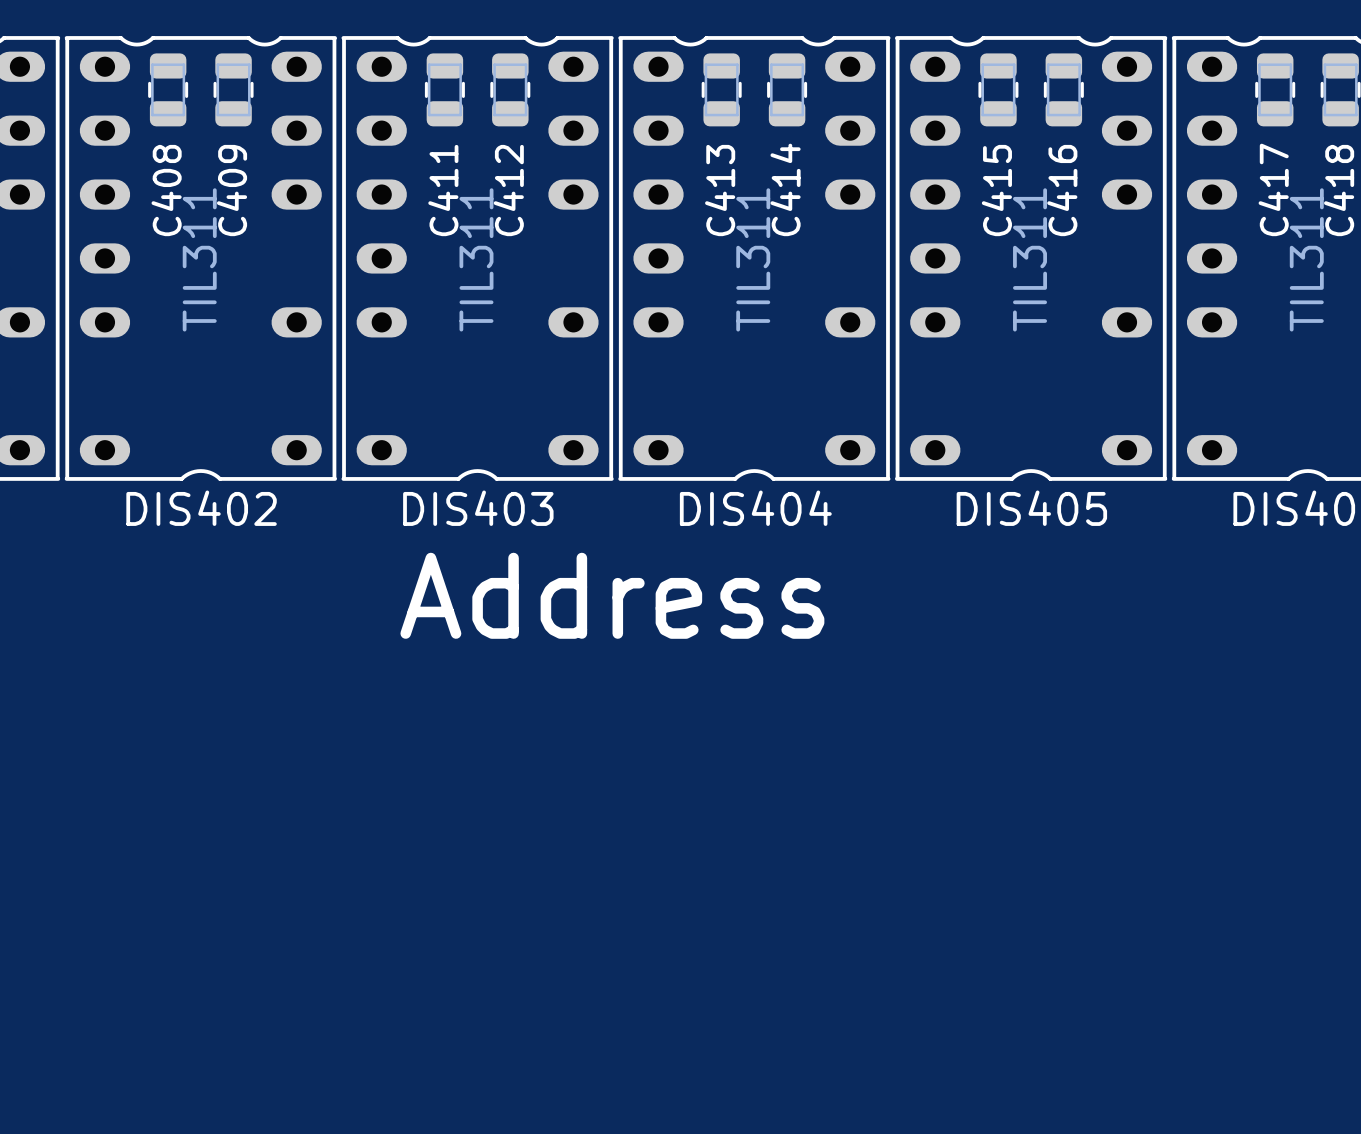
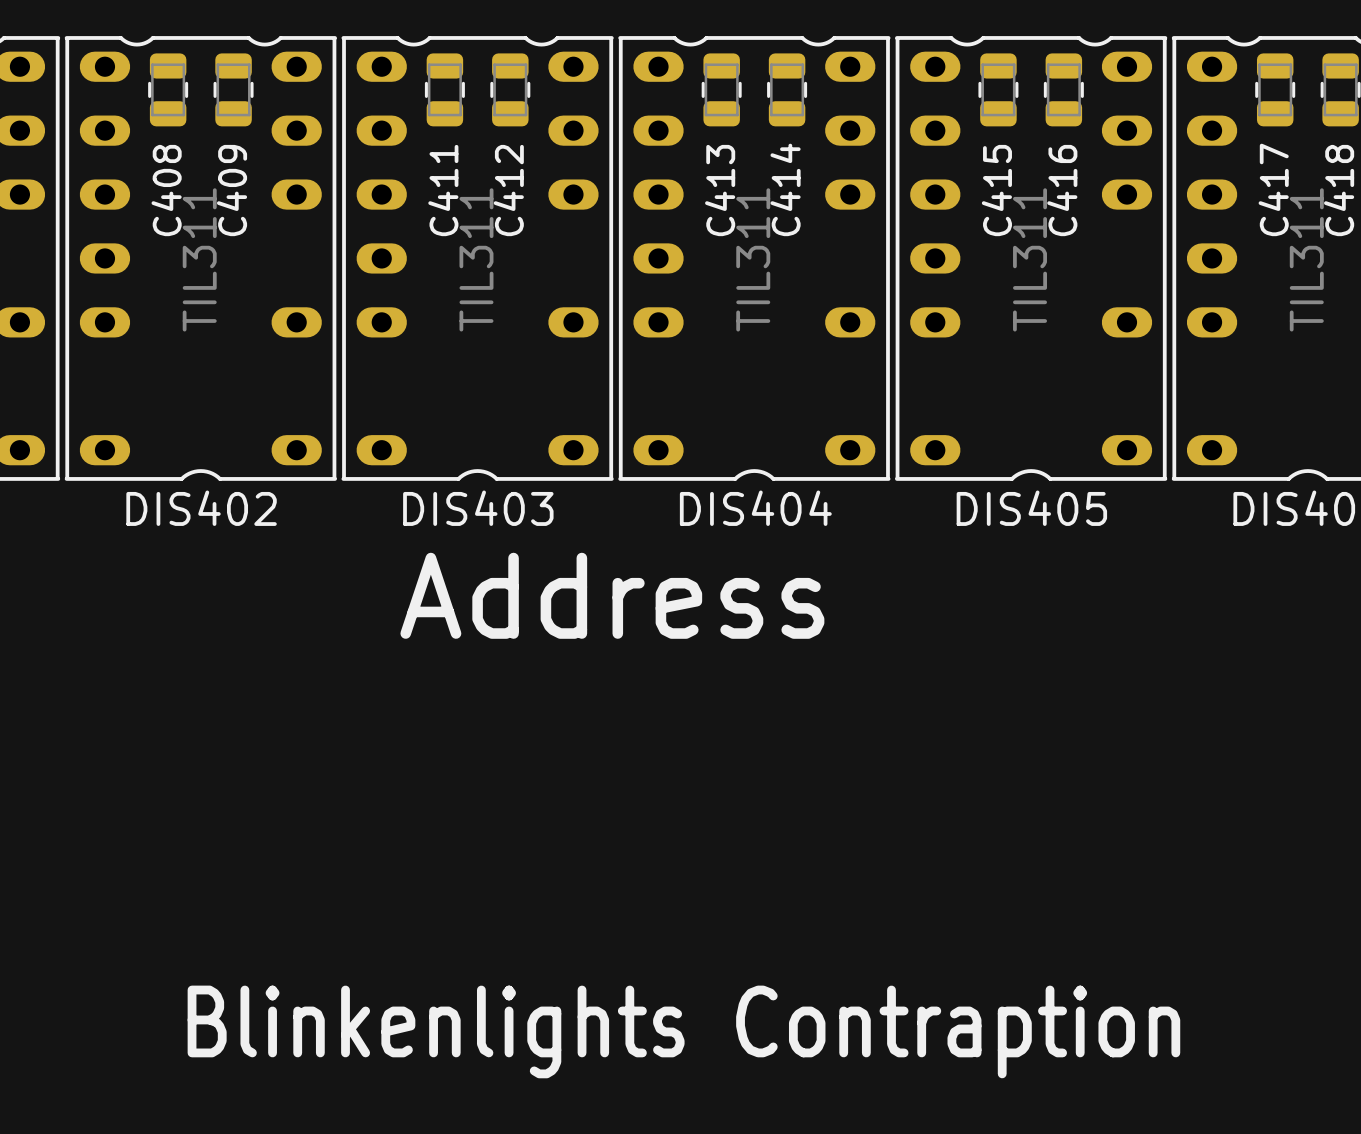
text: none -> Blinkenlights Contraption (683, 1031)

